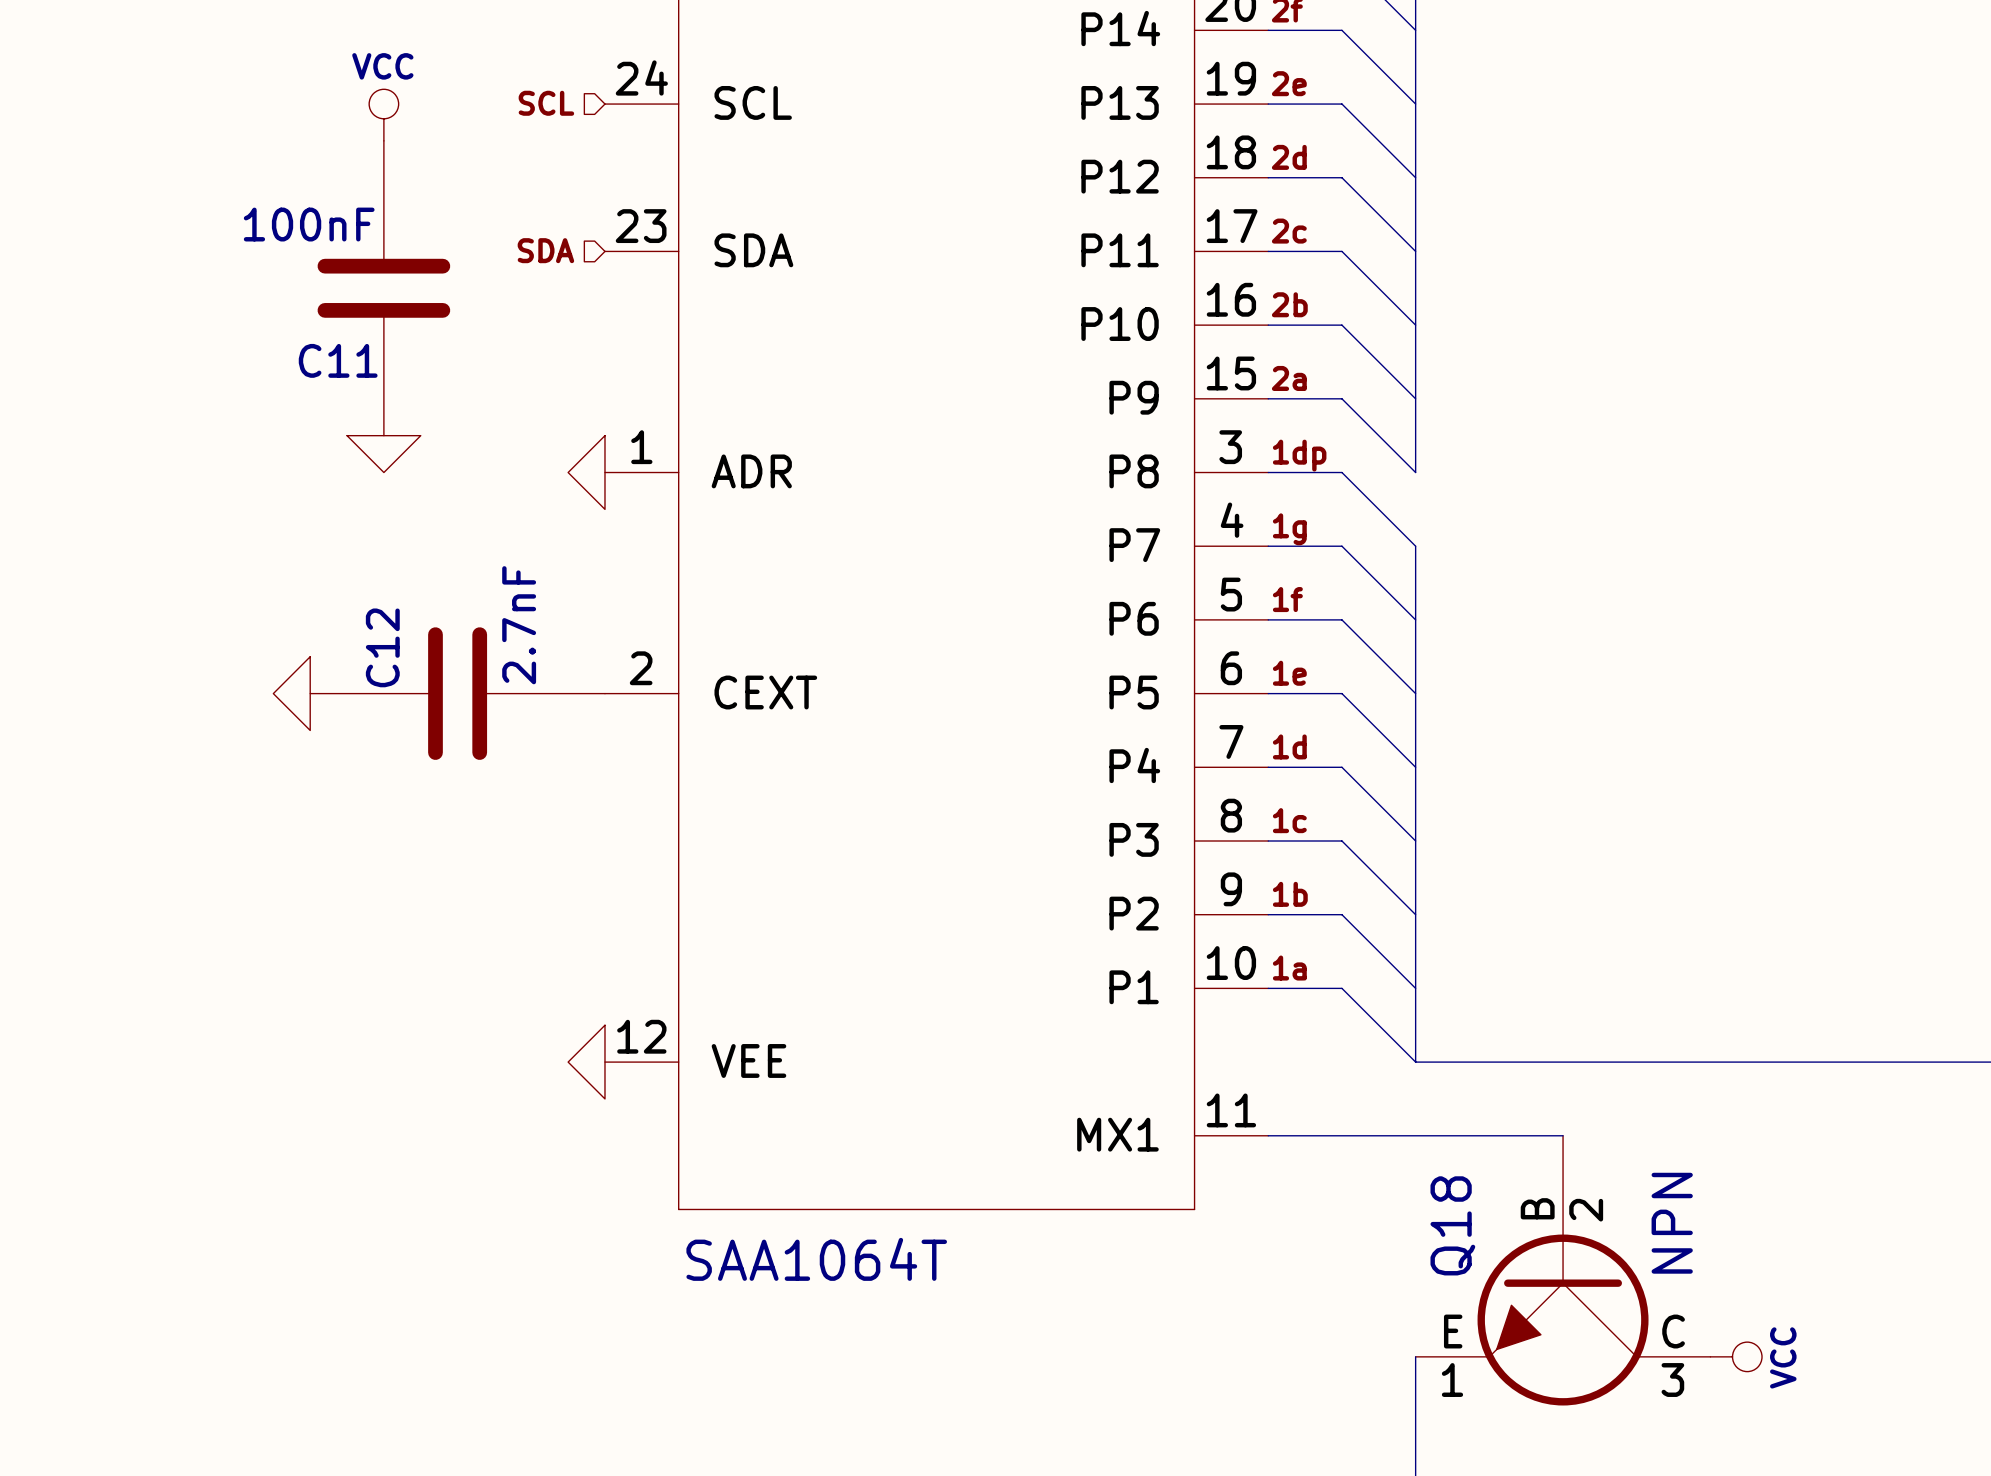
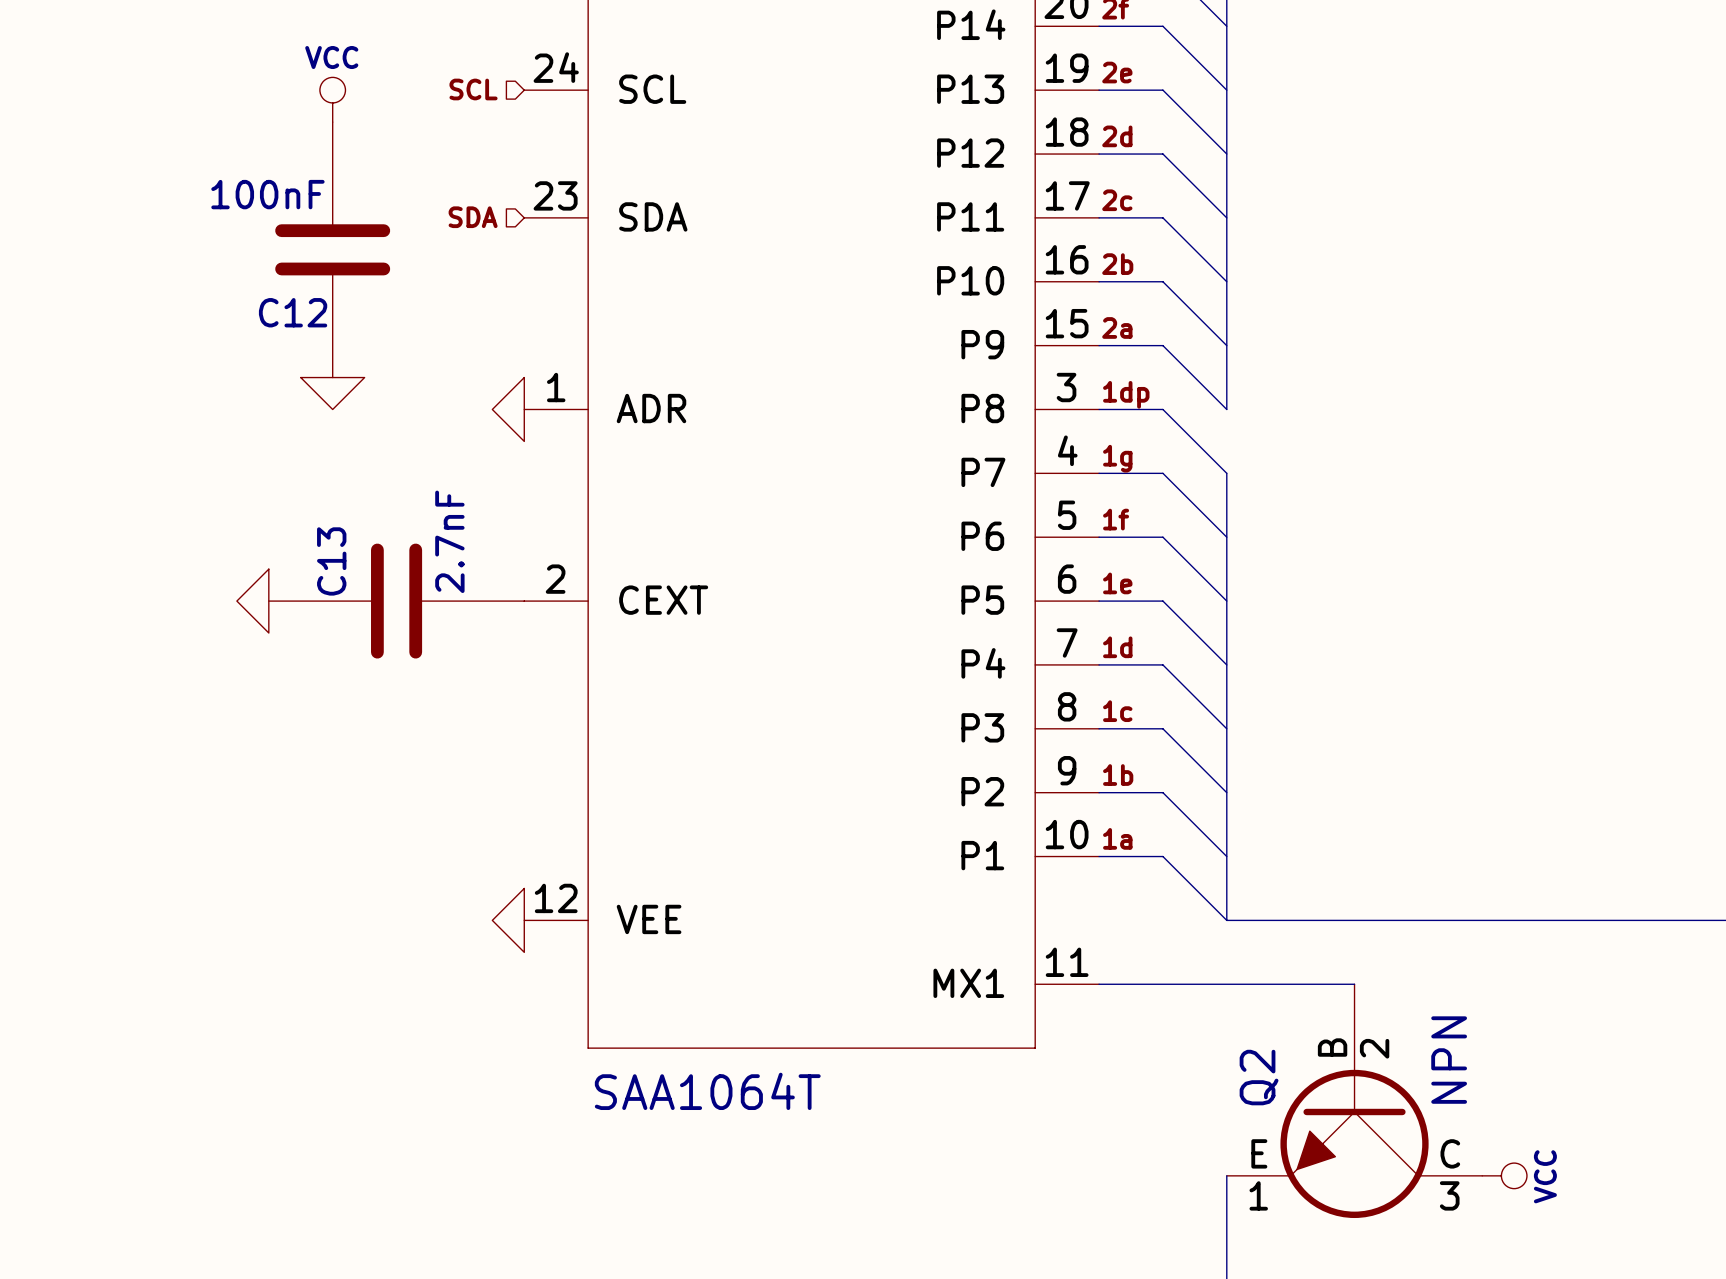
C11 name: C11 (338, 360) -> C12 (293, 312)
C12 name: C12 (382, 647) -> C13 (331, 561)
Q18 name: Q18 (1452, 1225) -> Q2 (1259, 1077)

